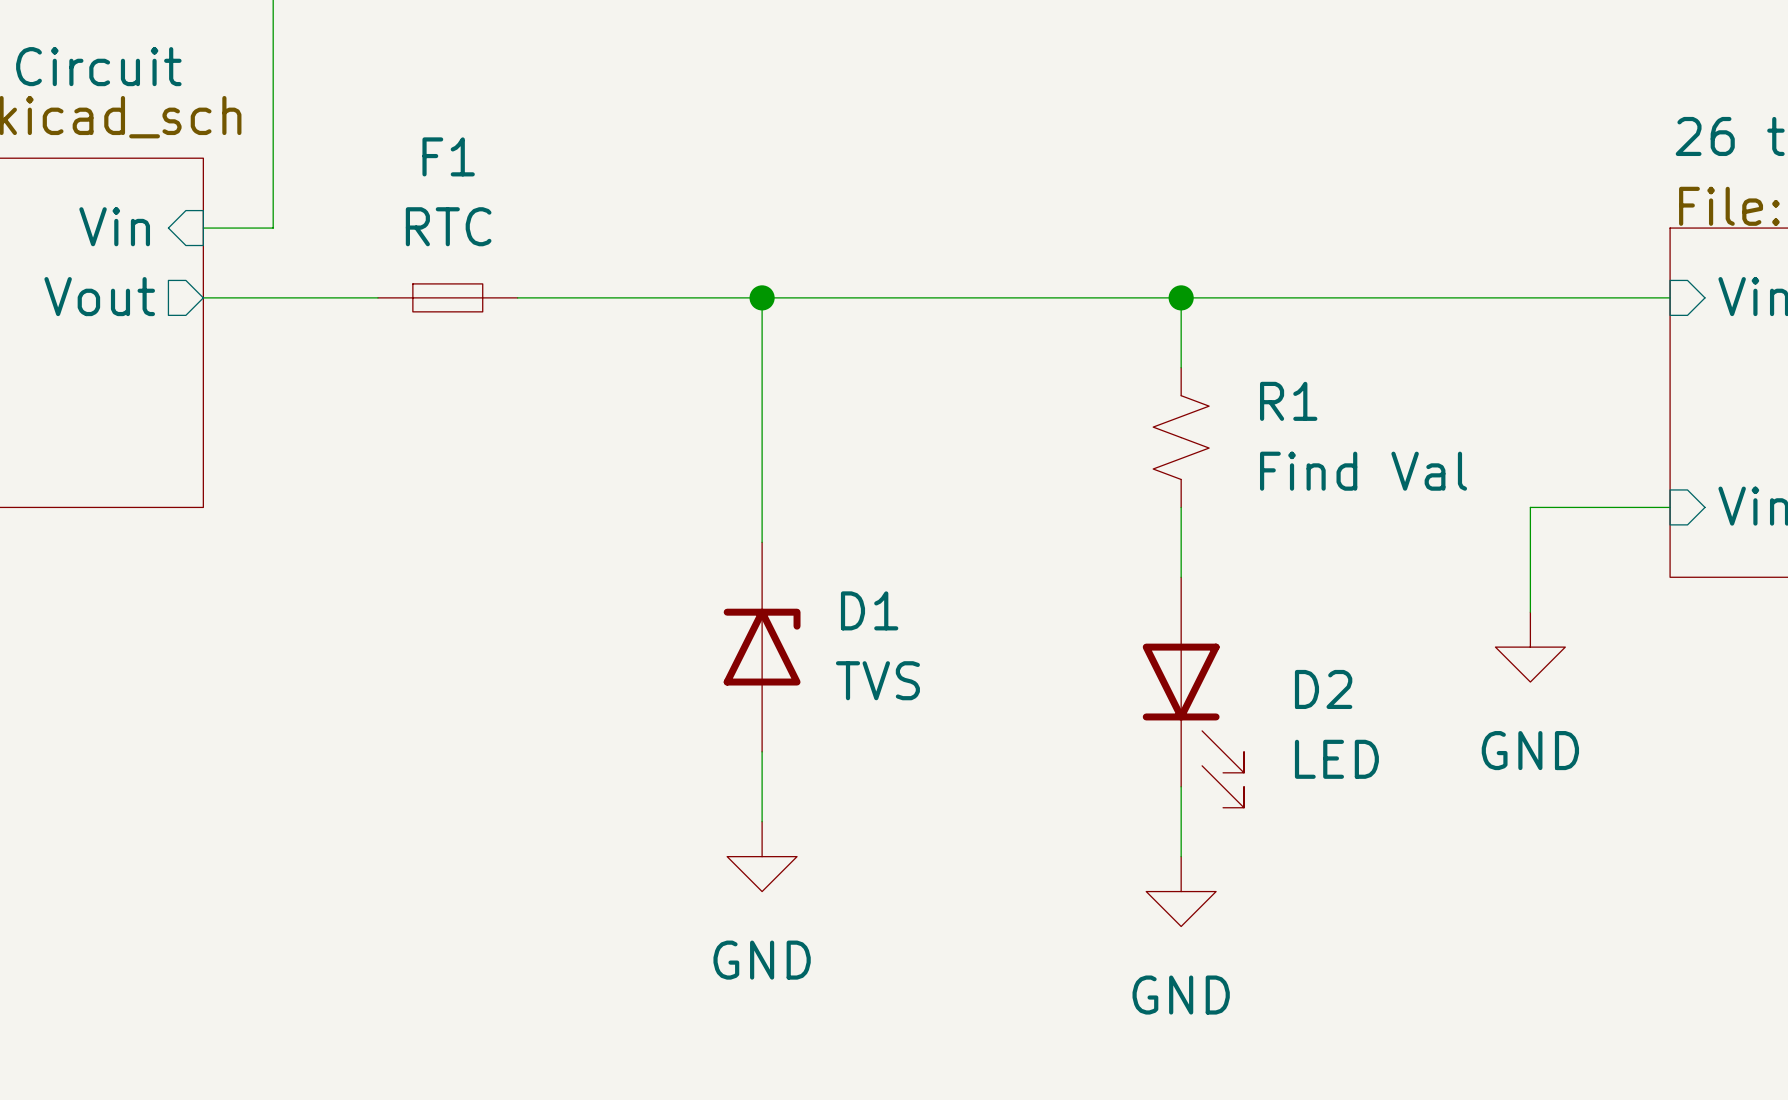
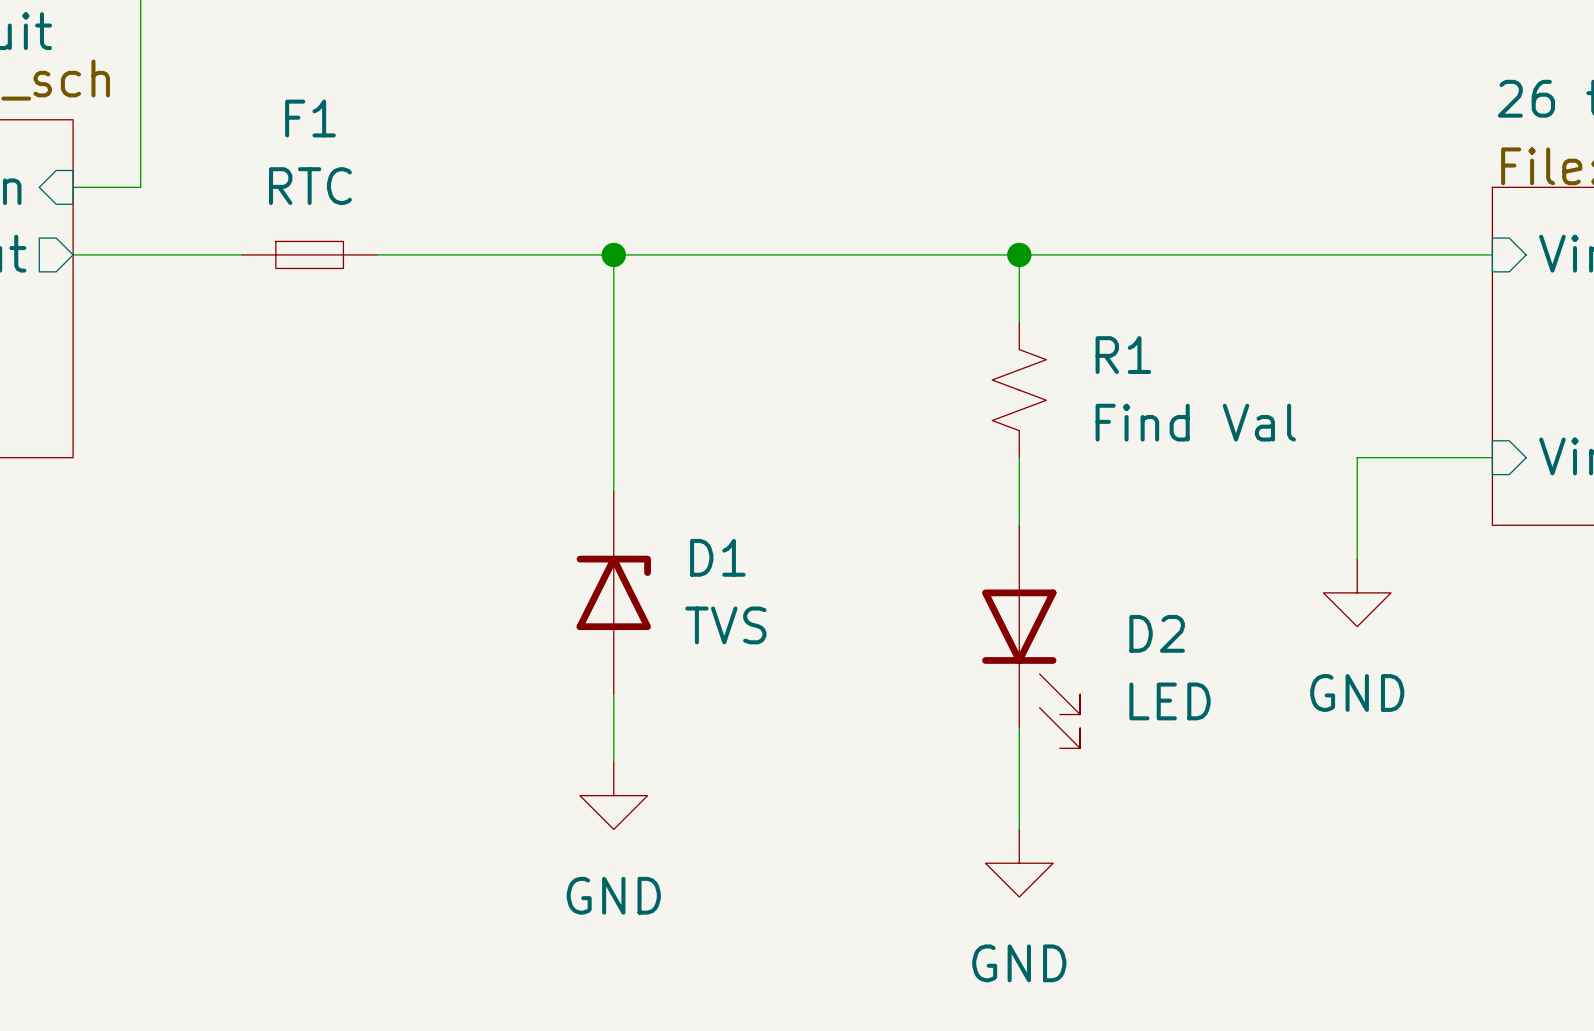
power symbol position: GND (1181, 891) -> GND (1019, 863)

